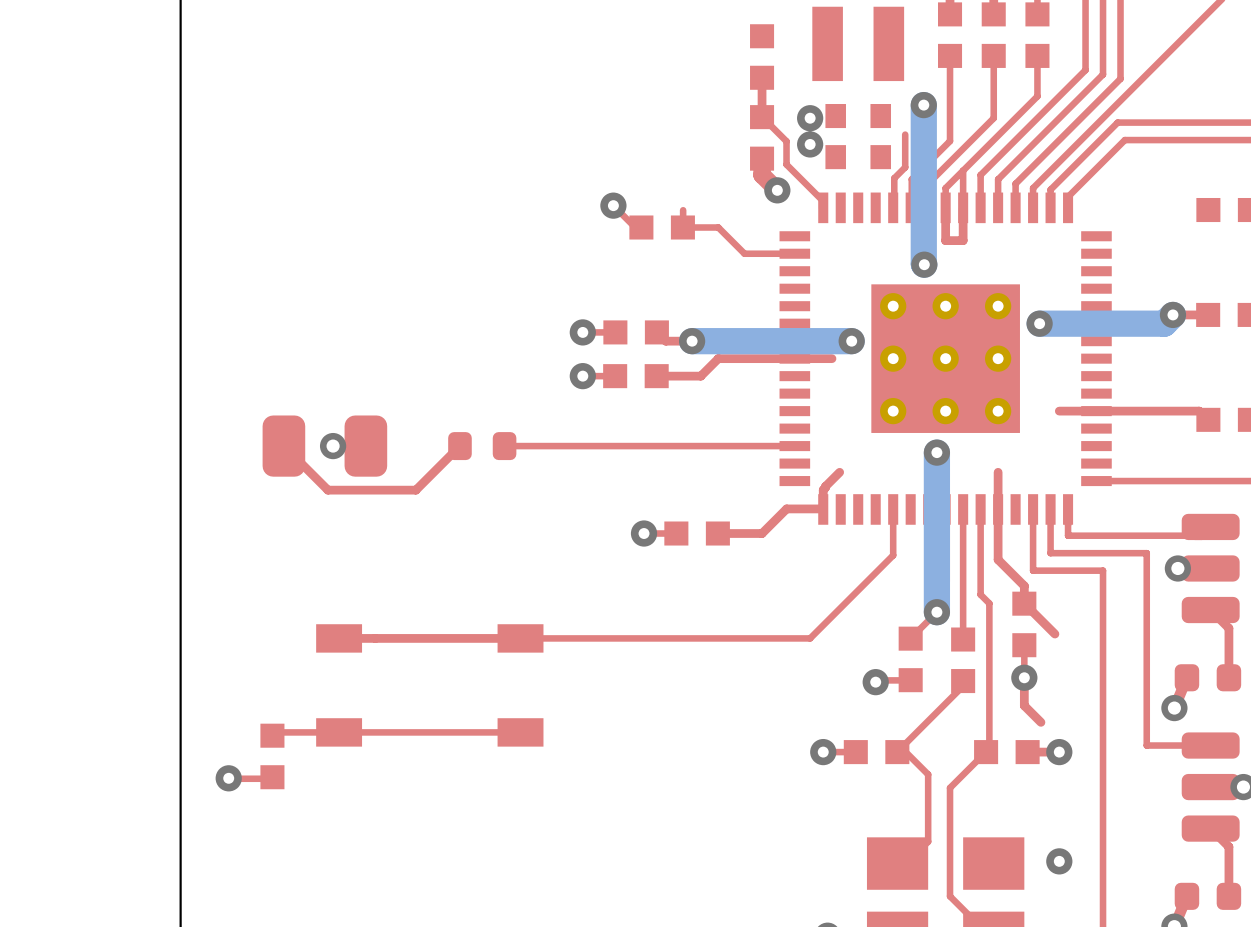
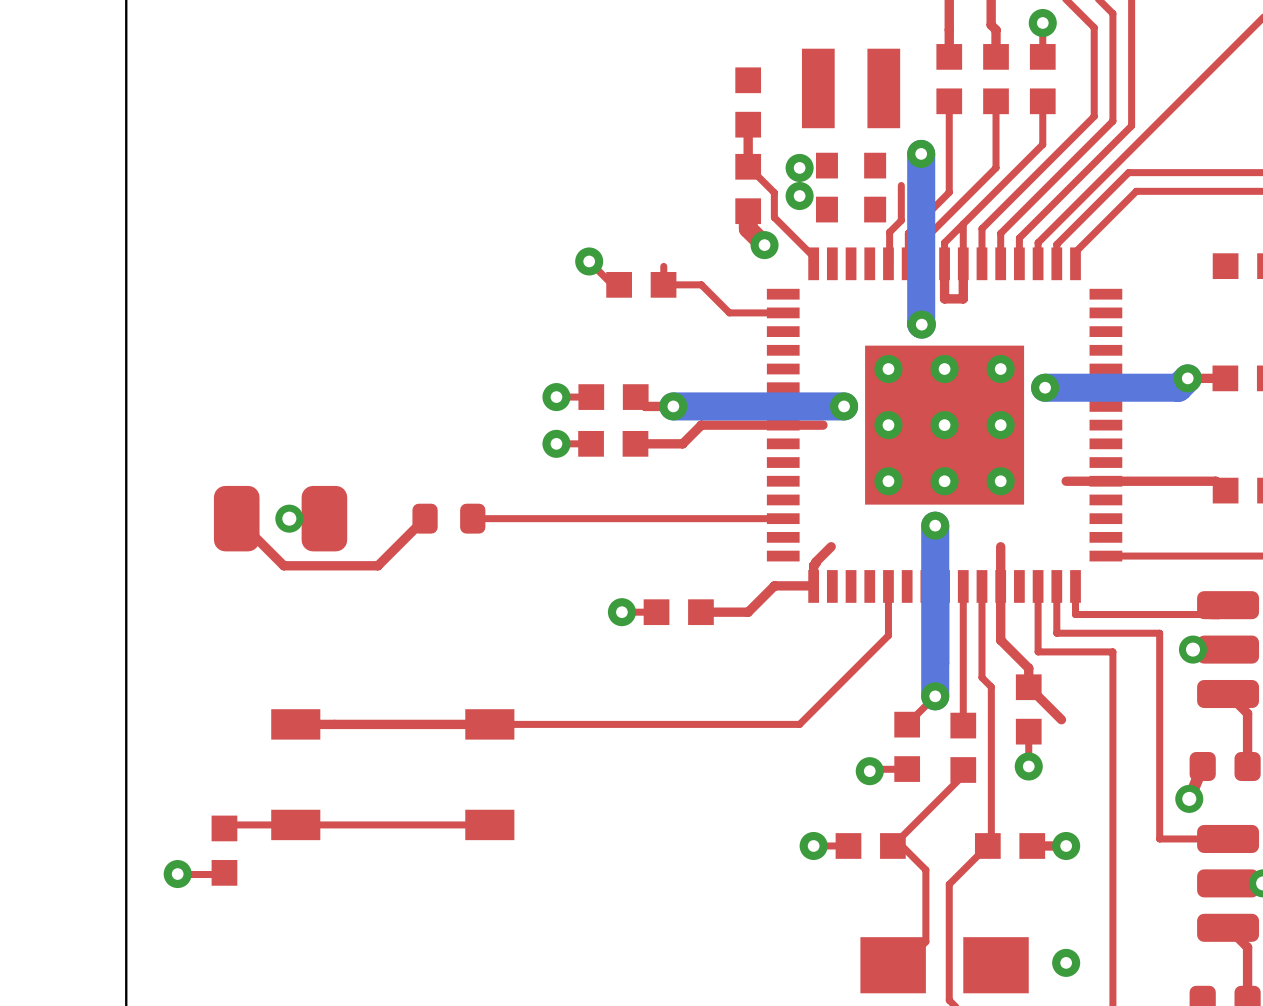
top track: (1024, 677) (1024, 705) (1040, 722) -> none

